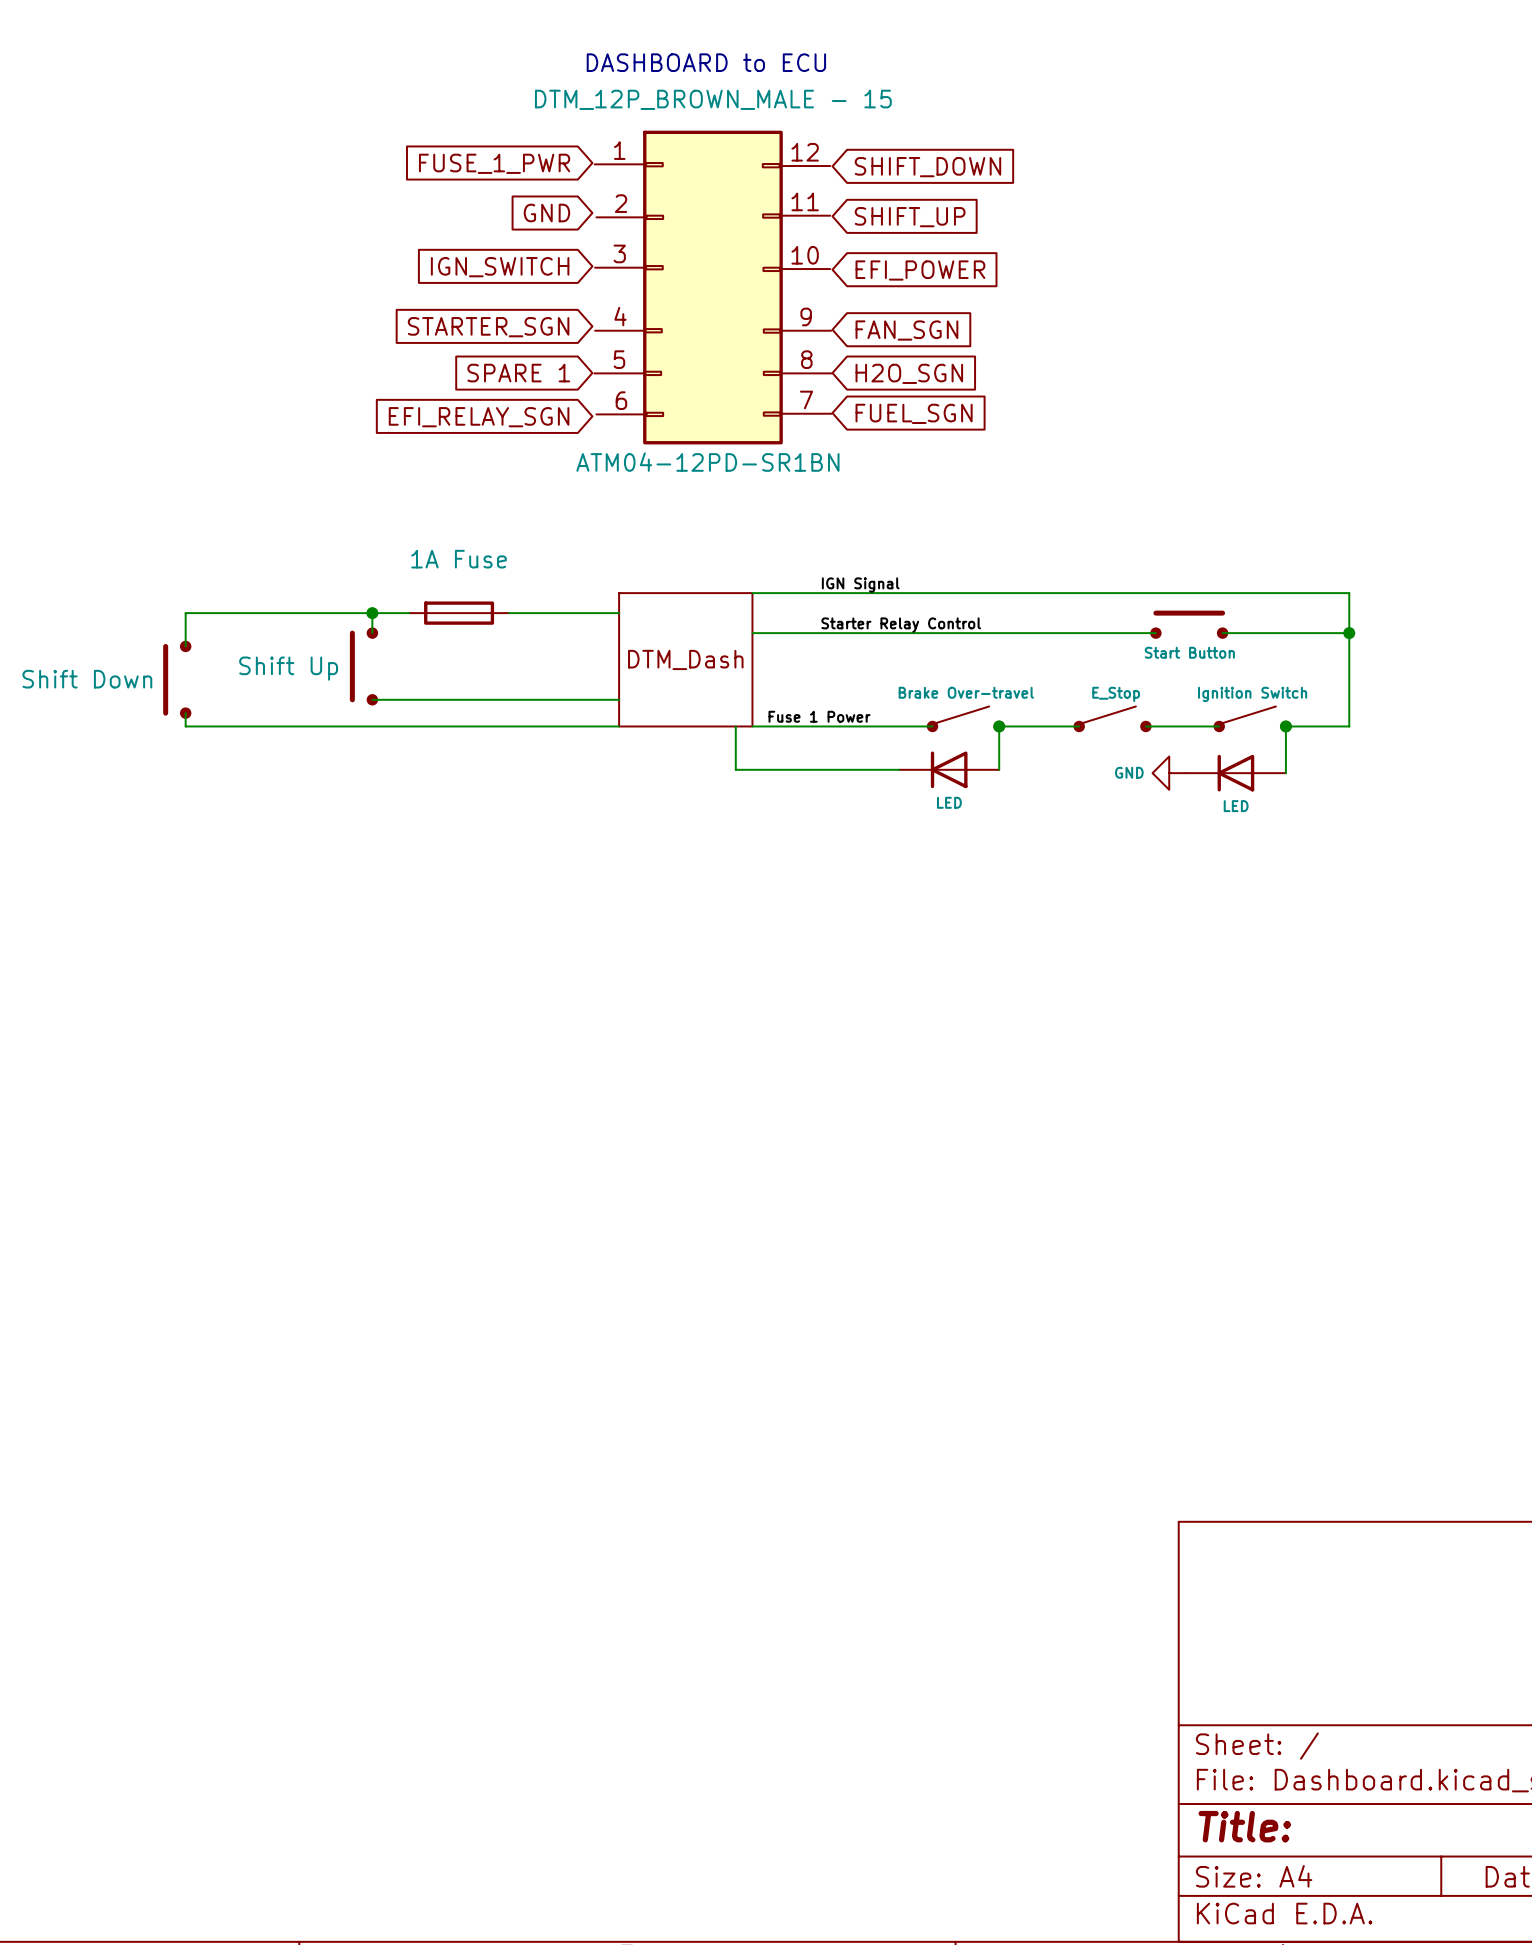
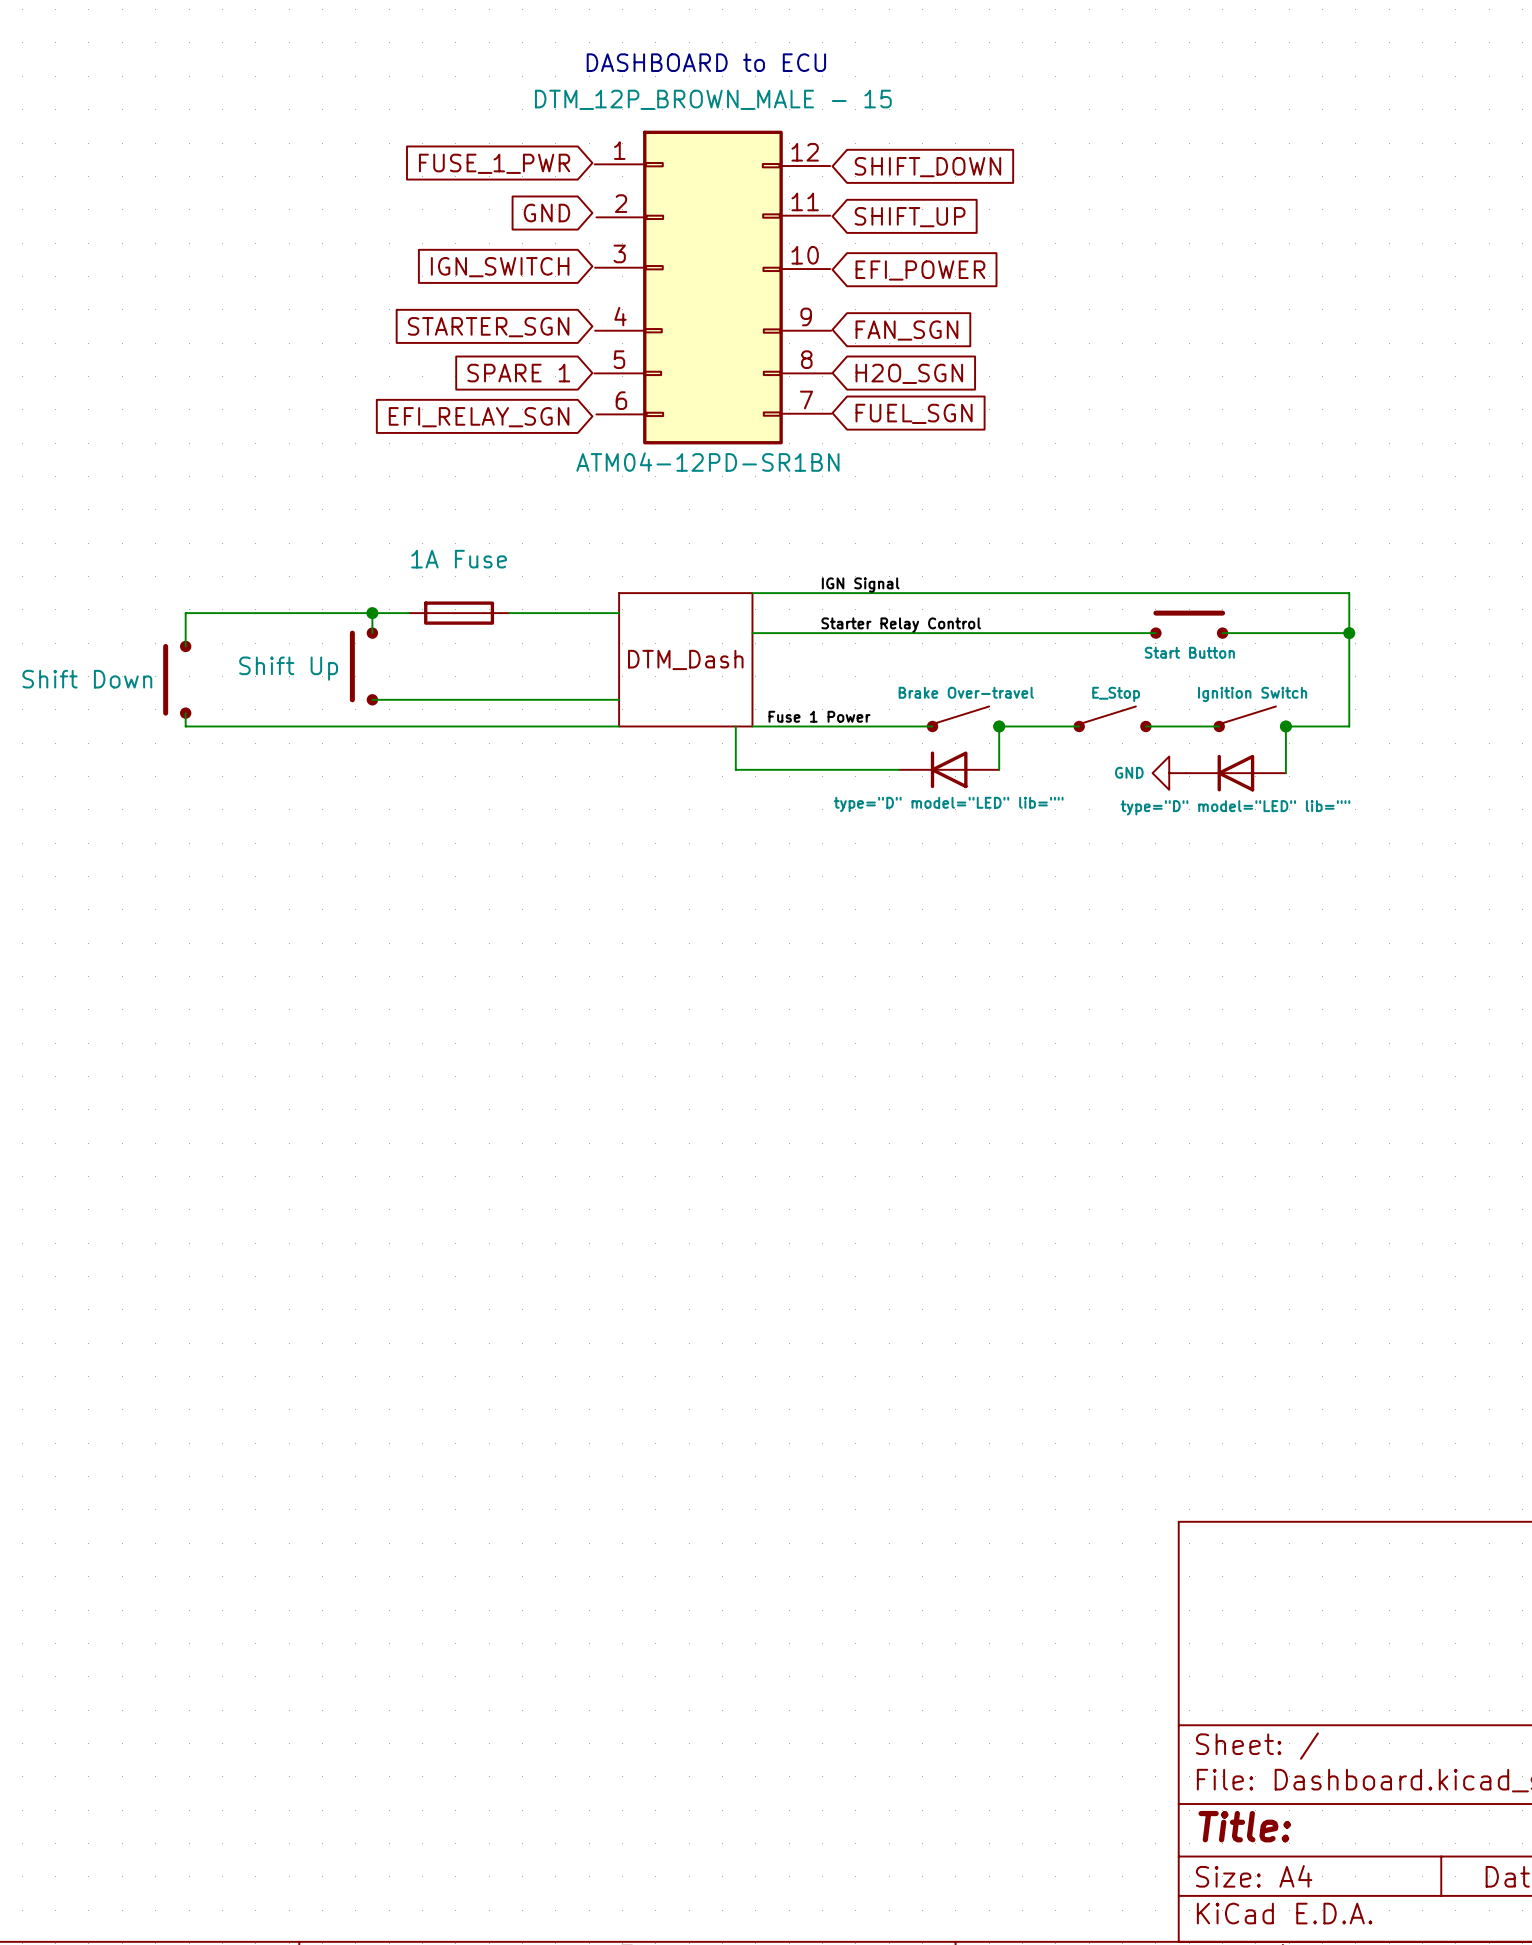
part value: LED (949, 802) -> type="D" model="LED" lib="" (948, 804)
part value: LED (1236, 806) -> type="D" model="LED" lib="" (1235, 807)

